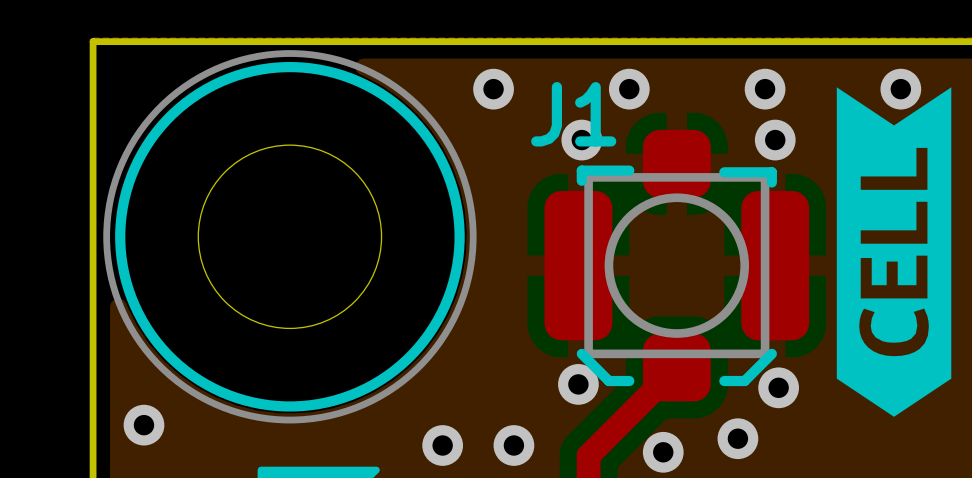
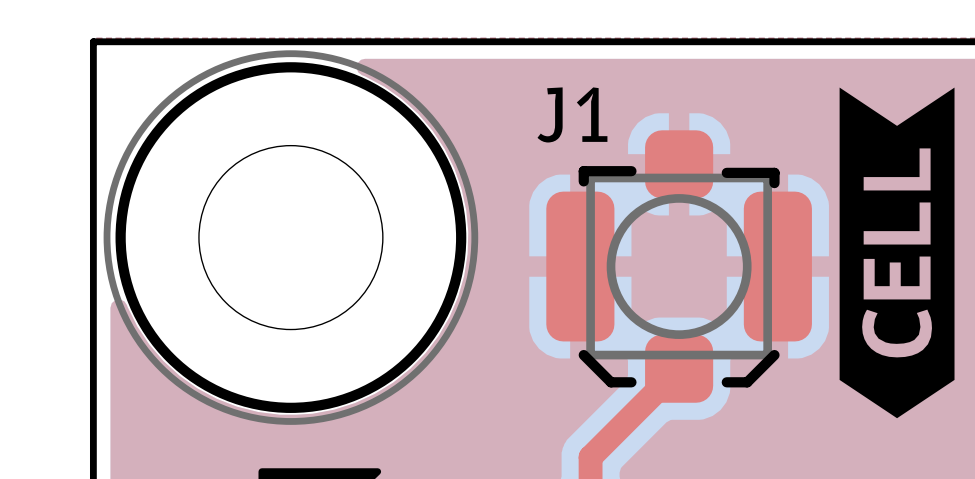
via: (493, 89) -> none
via: (629, 89) -> none
via: (765, 89) -> none
via: (900, 89) -> none
via: (581, 140) -> none
via: (775, 140) -> none
via: (578, 384) -> none
via: (778, 387) -> none
via: (143, 425) -> none
via: (737, 438) -> none
via: (442, 445) -> none
via: (513, 445) -> none
via: (663, 452) -> none

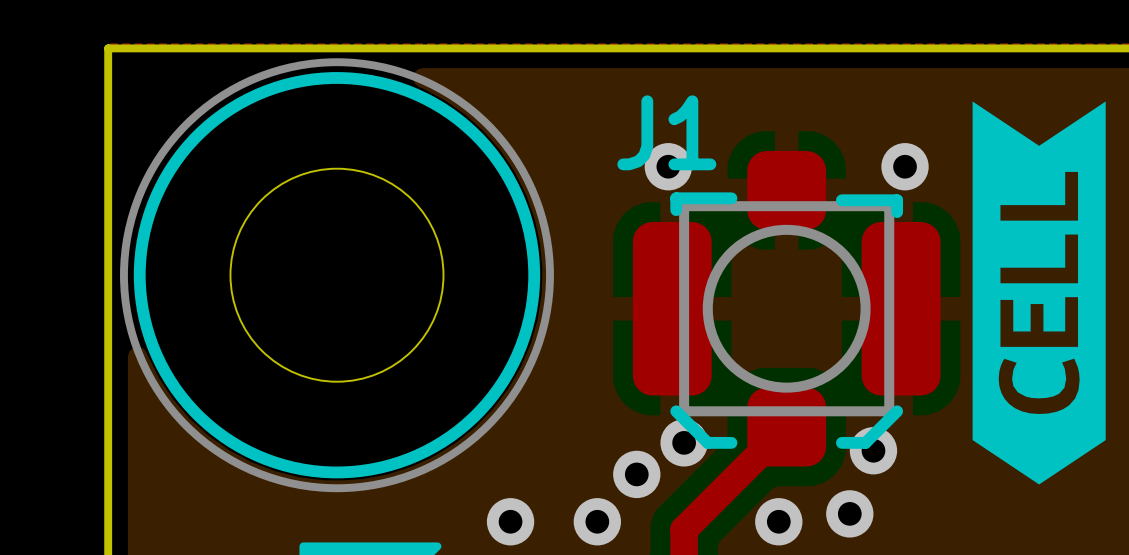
via: none -> (668, 166)
via: none -> (905, 166)
via: none -> (684, 442)
via: none -> (873, 450)
via: none -> (636, 474)
via: none -> (849, 513)
via: none -> (510, 521)
via: none -> (597, 521)
via: none -> (778, 521)

